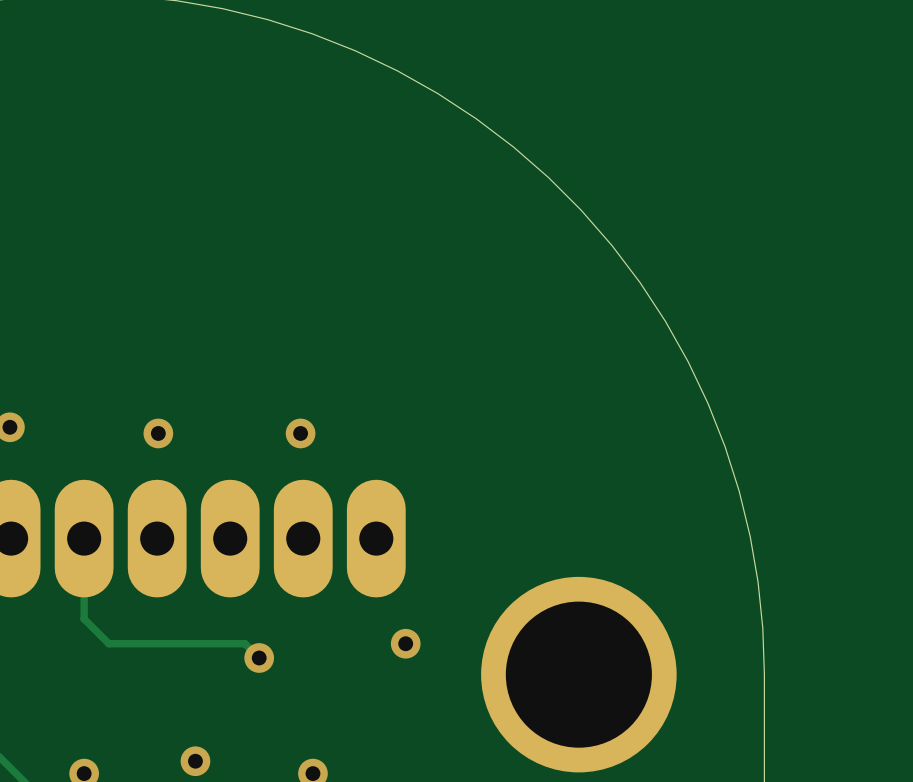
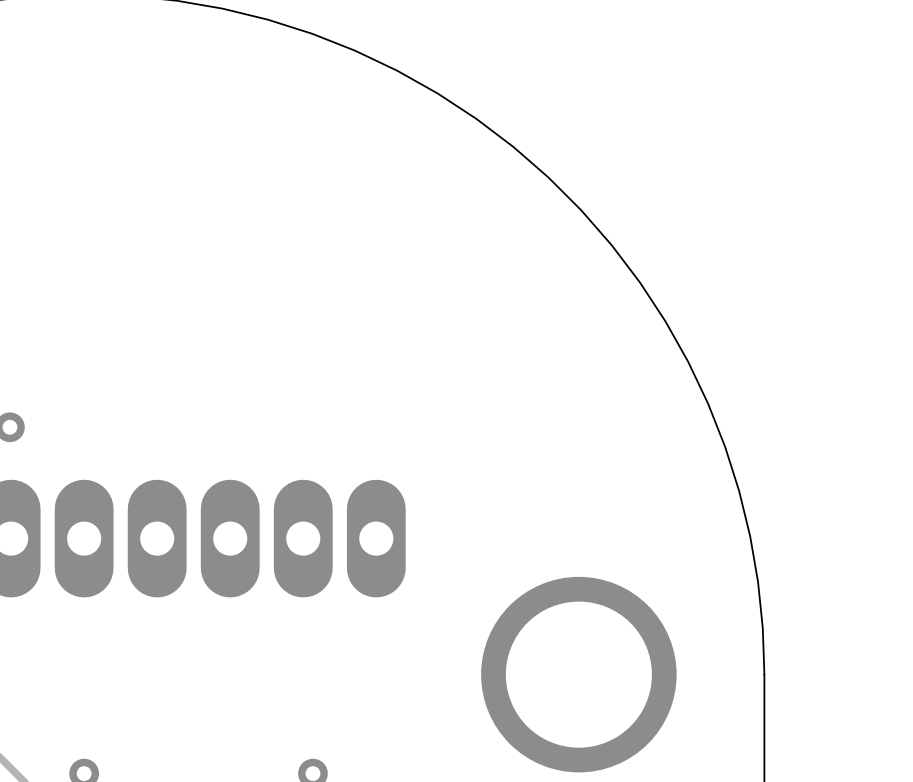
via: (158, 433) -> none
via: (300, 433) -> none
track: (84, 538) (84, 618) (108, 643) (244, 643) (259, 657) -> none
via: (405, 643) -> none
via: (259, 657) -> none
via: (195, 761) -> none

